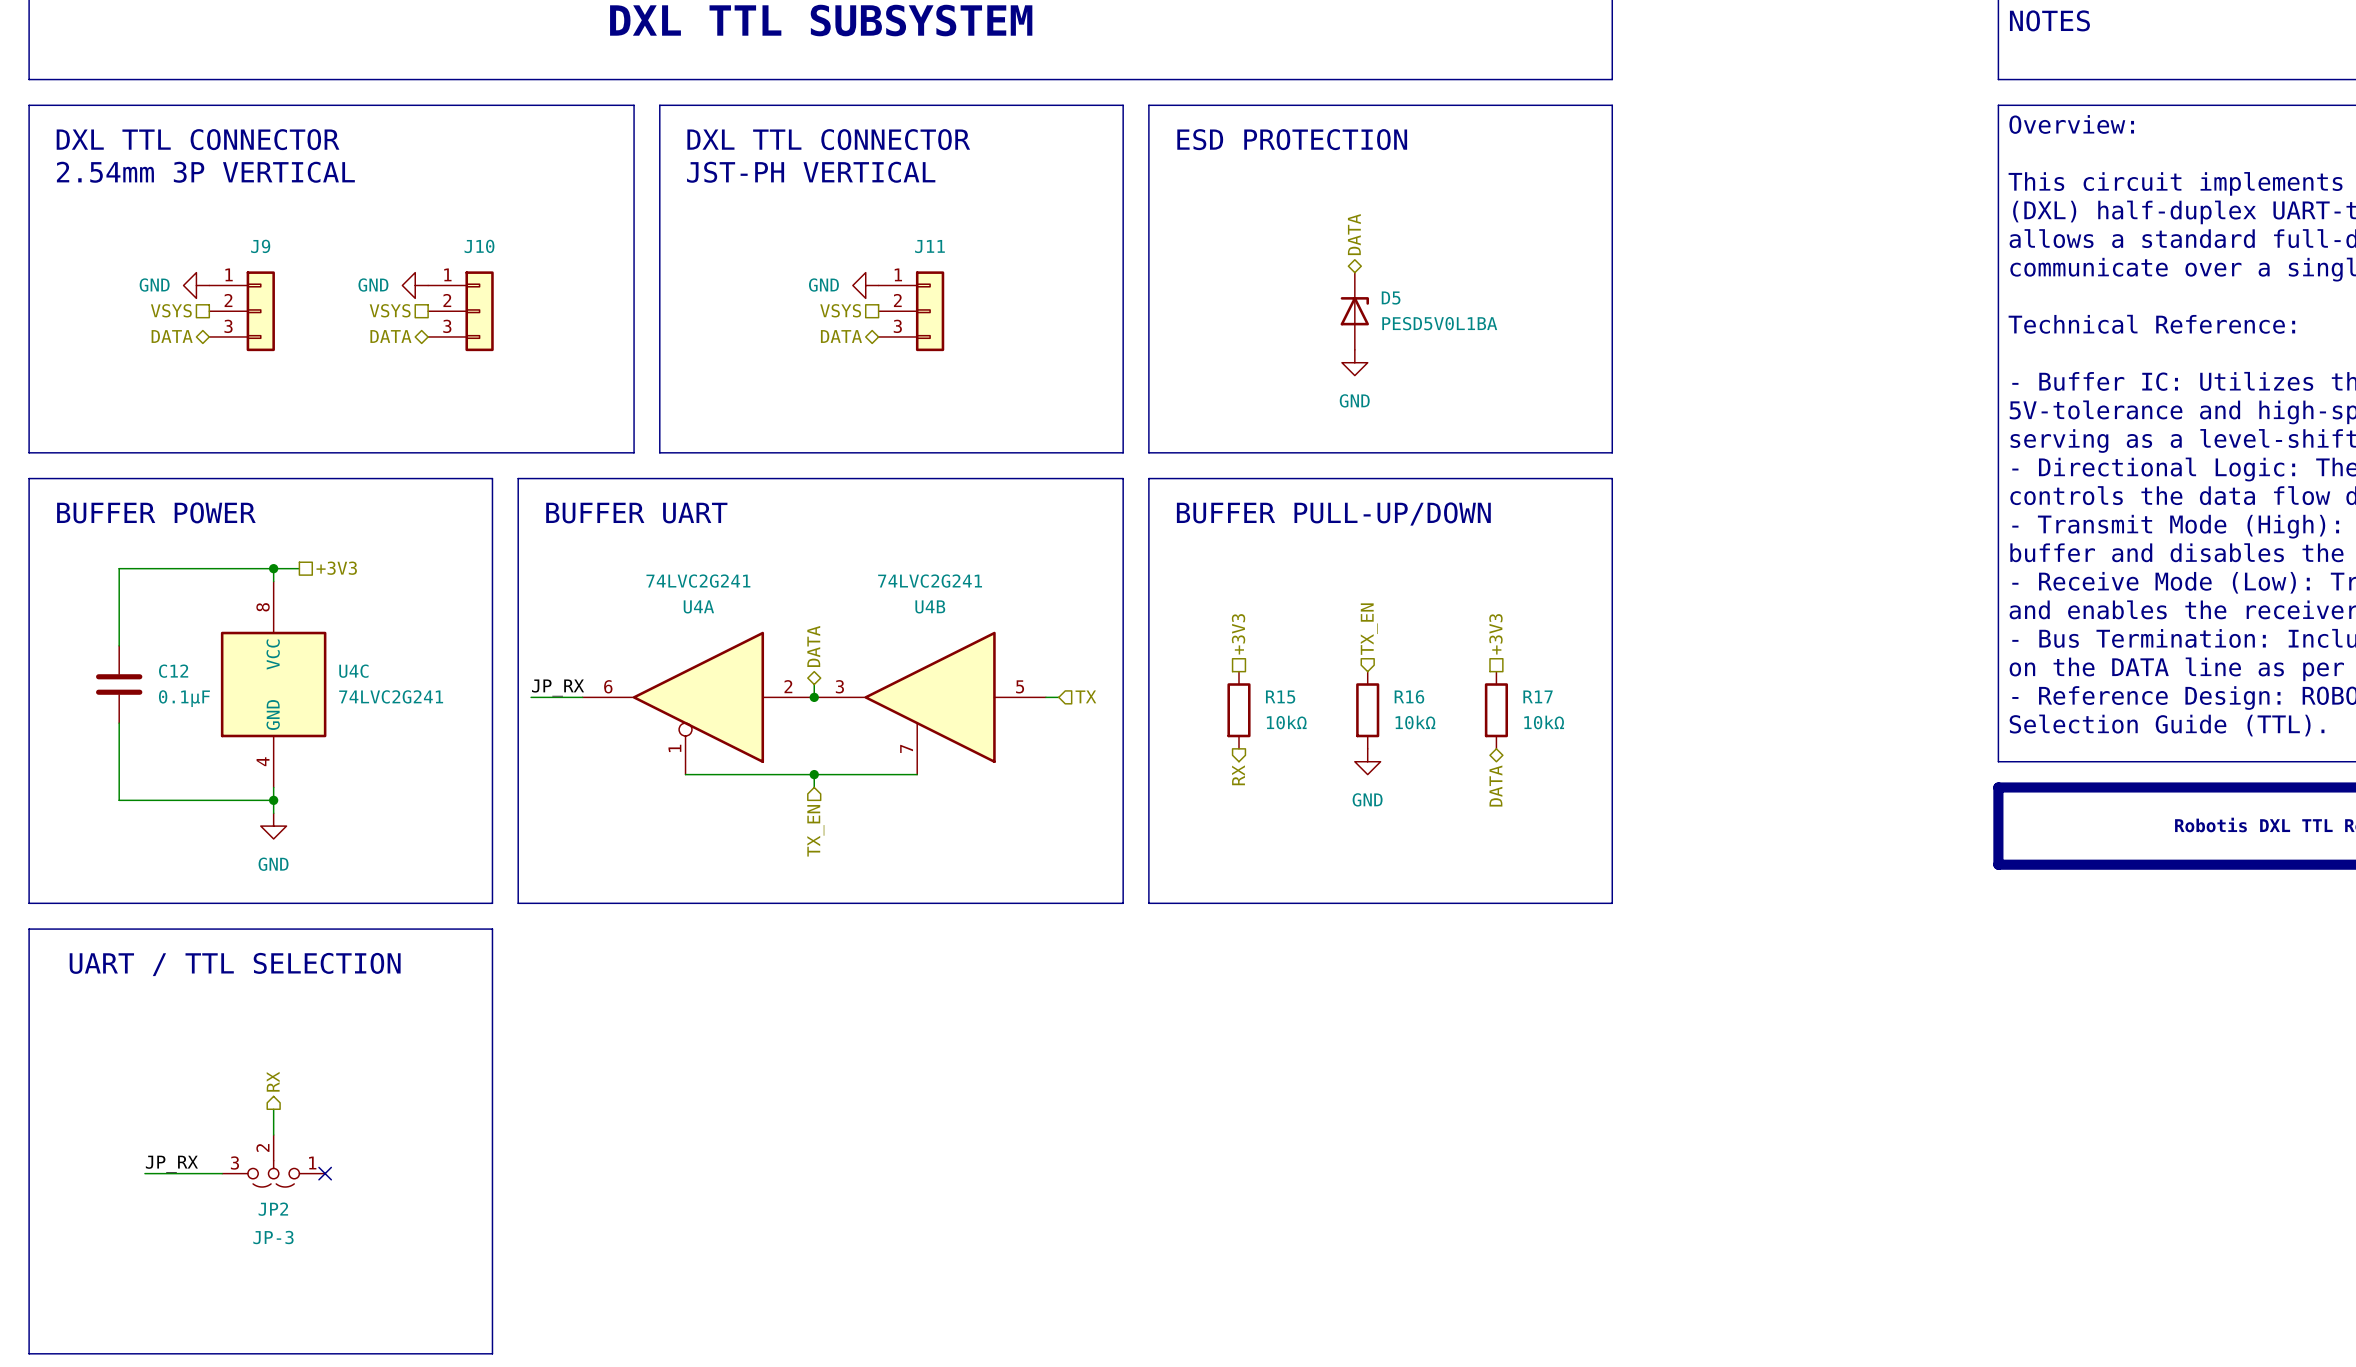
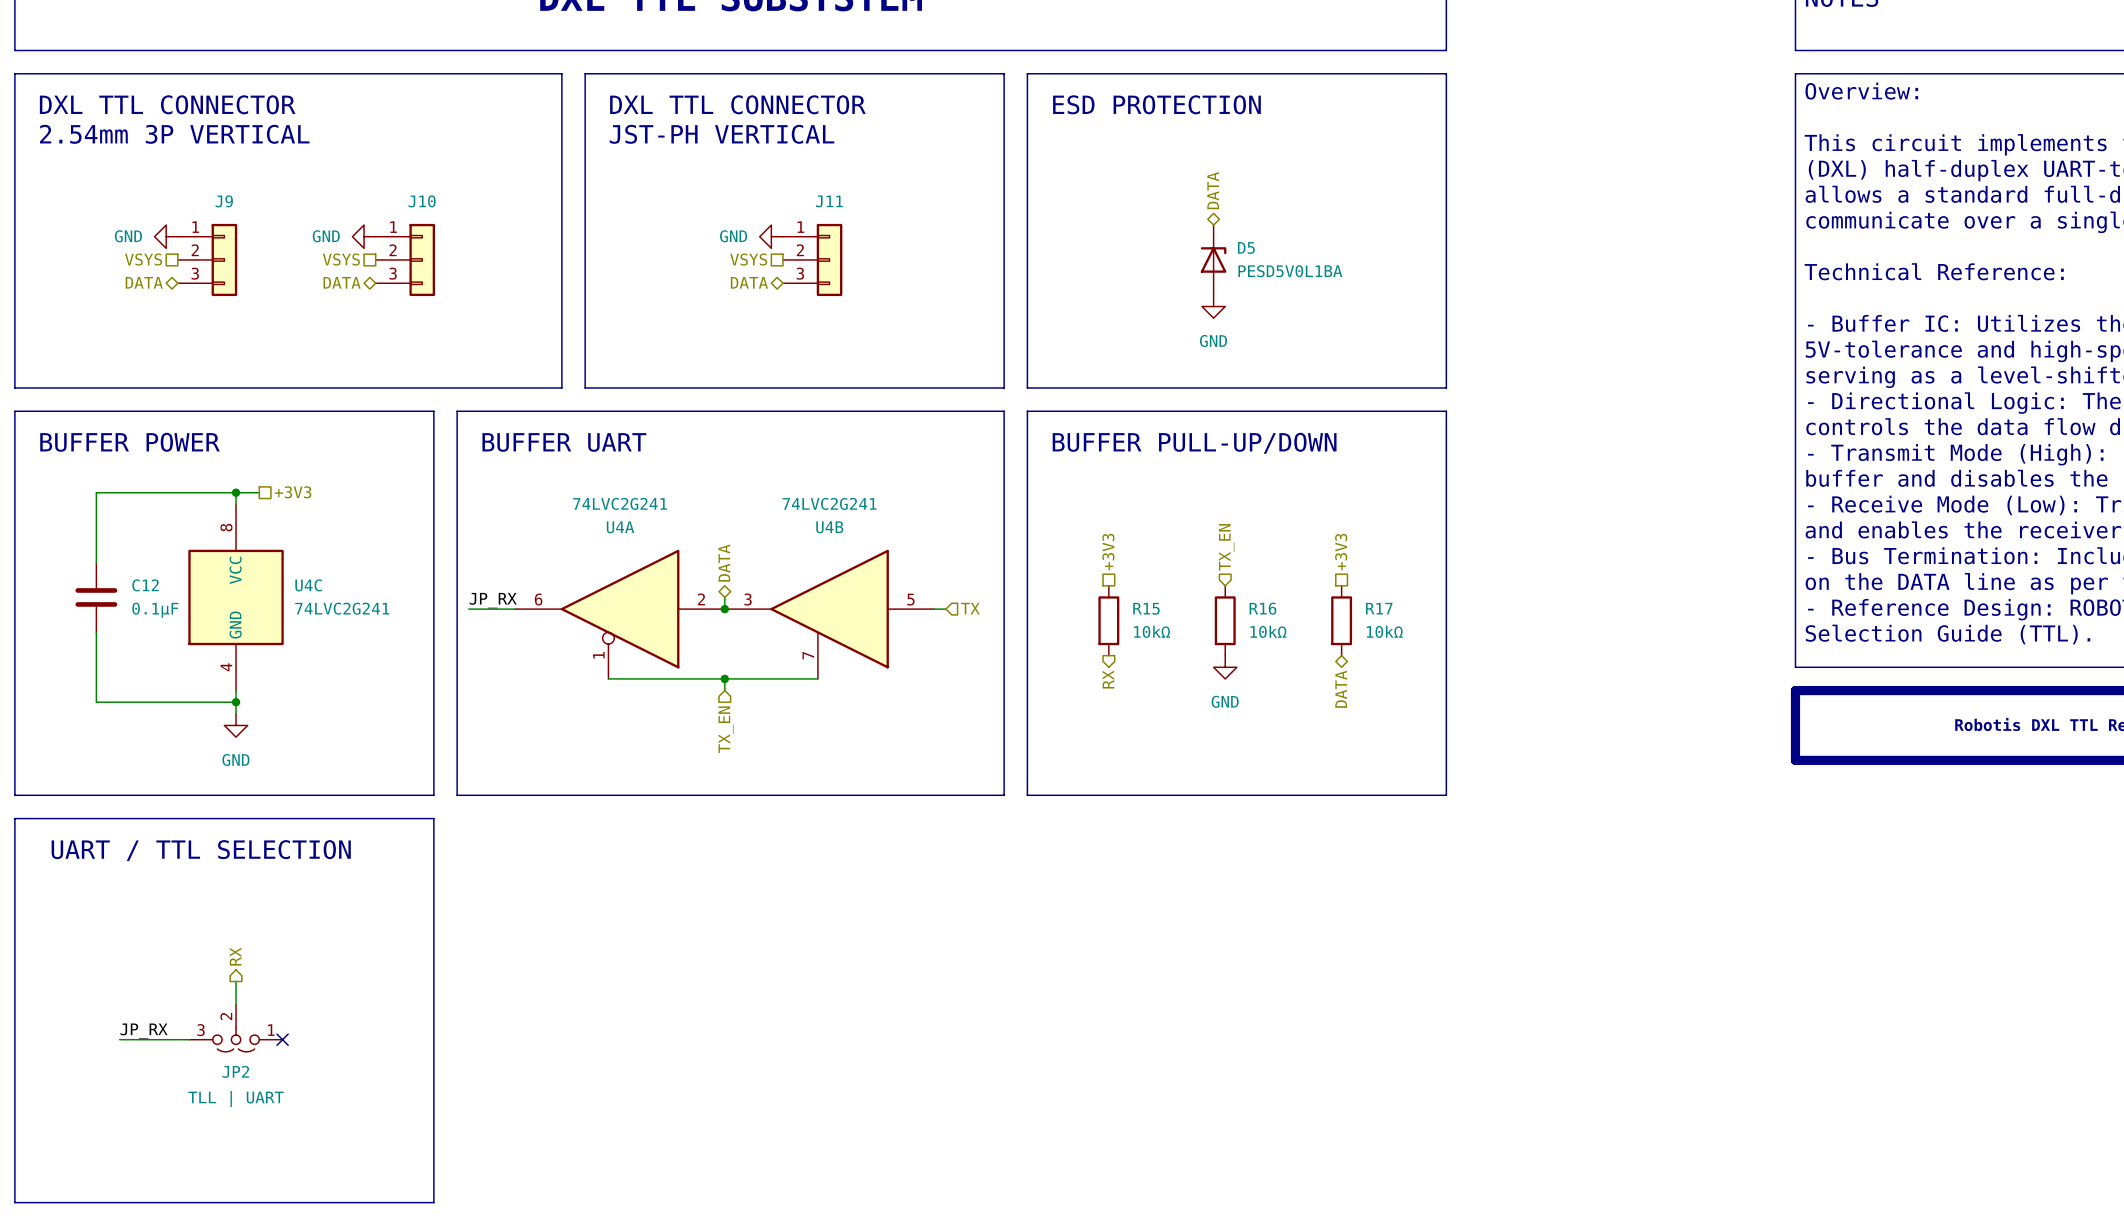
JP2 value: JP-3 (273, 1237) -> TLL | UART (236, 1099)

